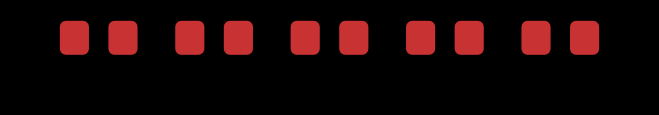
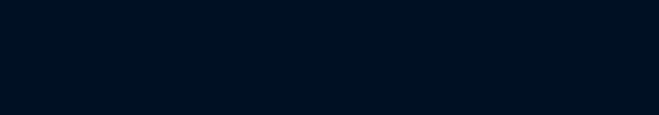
part: (98, 37) -> none
part: (214, 37) -> none
part: (329, 37) -> none
part: (444, 37) -> none
part: (560, 37) -> none

